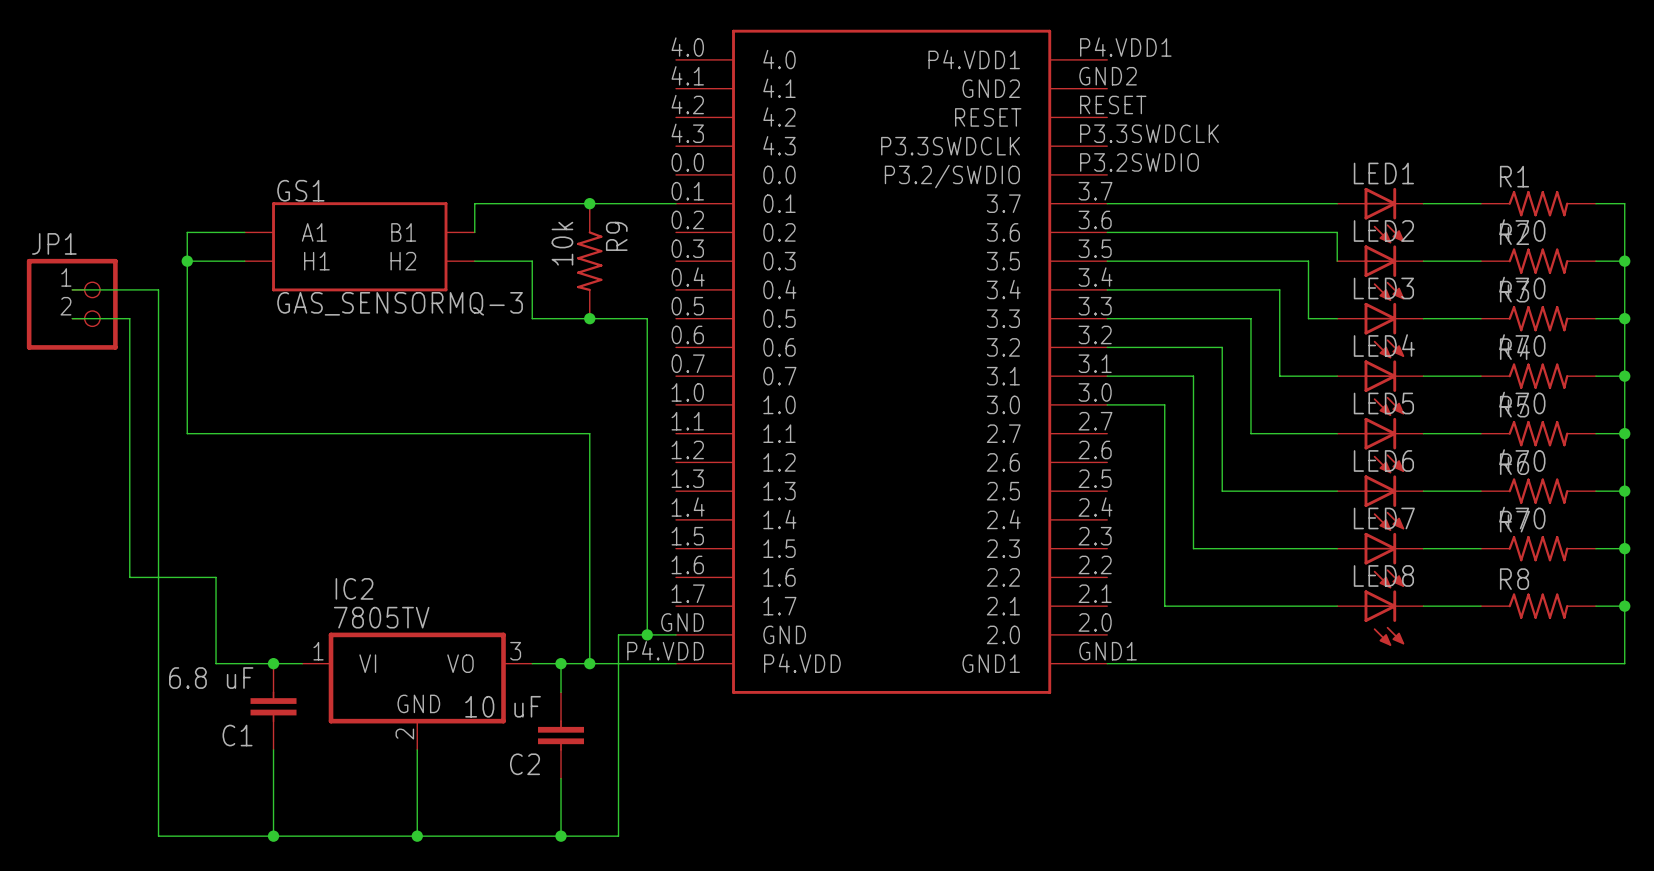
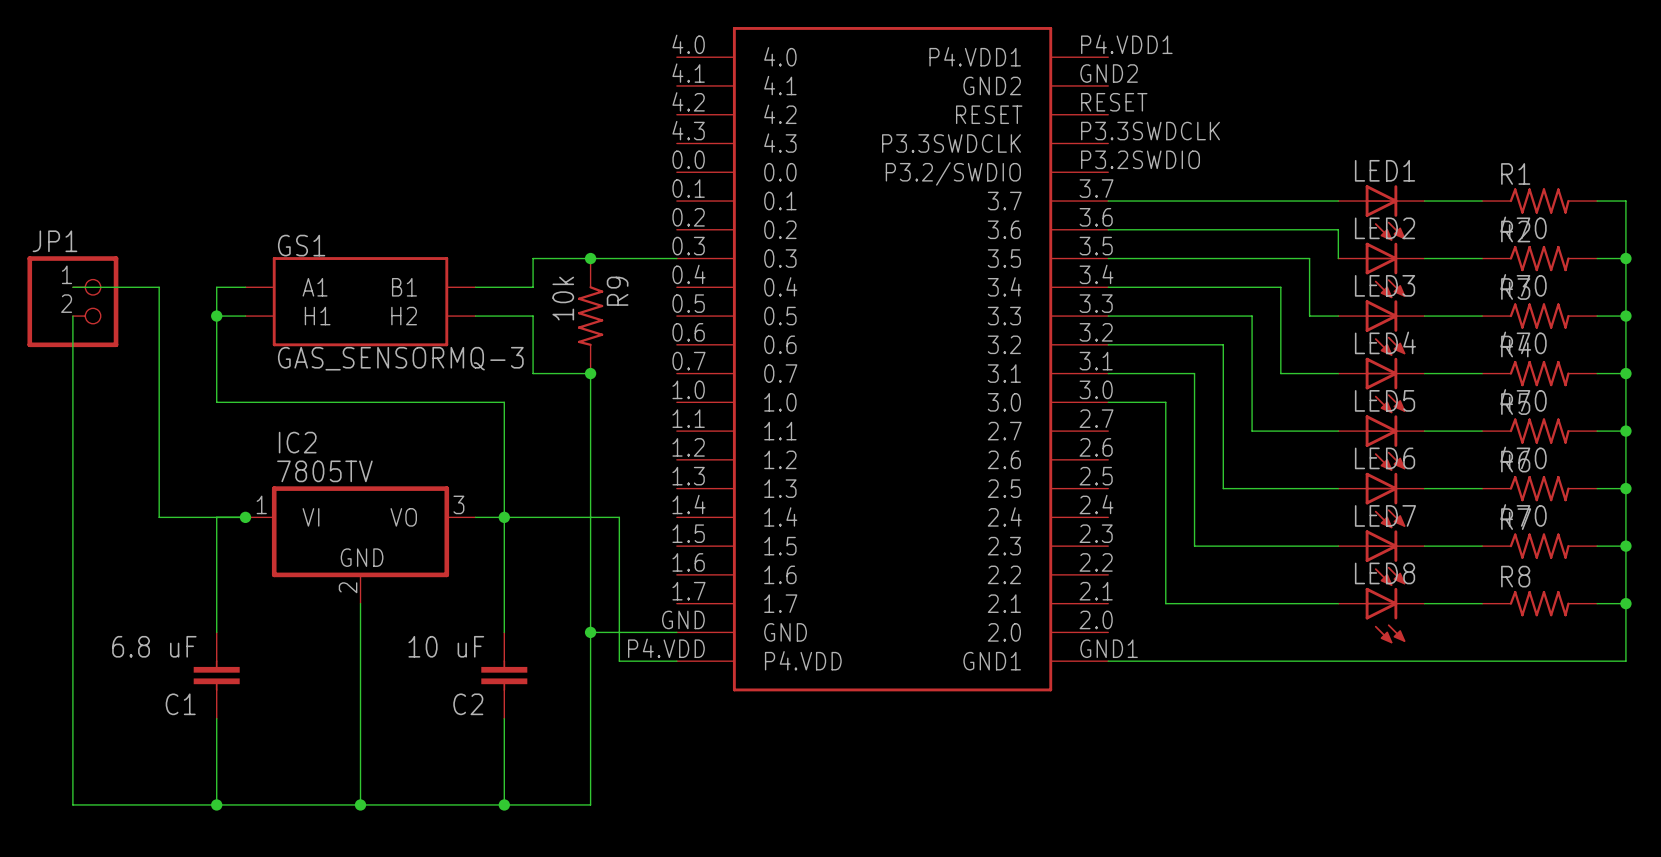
junction: (589, 203) -> none
wire: (676, 203) (474, 203) (474, 232) -> none
wire: (244, 232) (187, 232) (187, 433) (589, 433) -> (475, 316) (533, 316) (533, 373) (590, 373) (590, 431)
GS1 position: (359, 246) -> (360, 301)
wire: (187, 261) (244, 261) -> none
junction position: (187, 261) -> (216, 316)
wire: (474, 261) (532, 261) -> (676, 258) (533, 258)
R9 position: (589, 261) -> (590, 316)
junction: none -> (590, 258)
wire: none -> (245, 287) (216, 287) (216, 402) (504, 402) (504, 632)
wire: (532, 289) (532, 318) (647, 318) (647, 634) -> (533, 287) (475, 287)
wire: (72, 318) (129, 318) (129, 577) (216, 577) -> (216, 517) (216, 574)
wire: none -> (72, 316) (72, 804) (590, 804) (590, 661)
wire: none -> (216, 316) (245, 316)
junction: (589, 318) -> none
junction: none -> (590, 373)
wire: (158, 519) (158, 836) (618, 836) (618, 663) (532, 663) -> (159, 517) (245, 517)
junction: none -> (245, 517)
wire: none -> (475, 517) (619, 517) (619, 632) (590, 632)
junction: none -> (504, 517)
wire: none -> (360, 603) (360, 804)
wire: (216, 634) (216, 663) (302, 663) -> none
junction: none -> (590, 632)
junction: (647, 634) -> none
junction: (273, 663) -> none
wire: (561, 663) (561, 692) -> none
junction: (561, 663) -> none
junction: (589, 663) -> none
IC2 position: (417, 691) -> (360, 544)
C1 position: (273, 706) -> (216, 675)
C2 position: (561, 735) -> (504, 675)
wire: (273, 749) (273, 836) -> (216, 718) (216, 804)
wire: (417, 749) (417, 836) -> (504, 718) (504, 804)
wire: (561, 778) (561, 836) -> none
junction: none -> (216, 804)
junction: none -> (360, 804)
junction: none -> (504, 804)
junction: (273, 836) -> none
junction: (417, 836) -> none
junction: (561, 836) -> none

